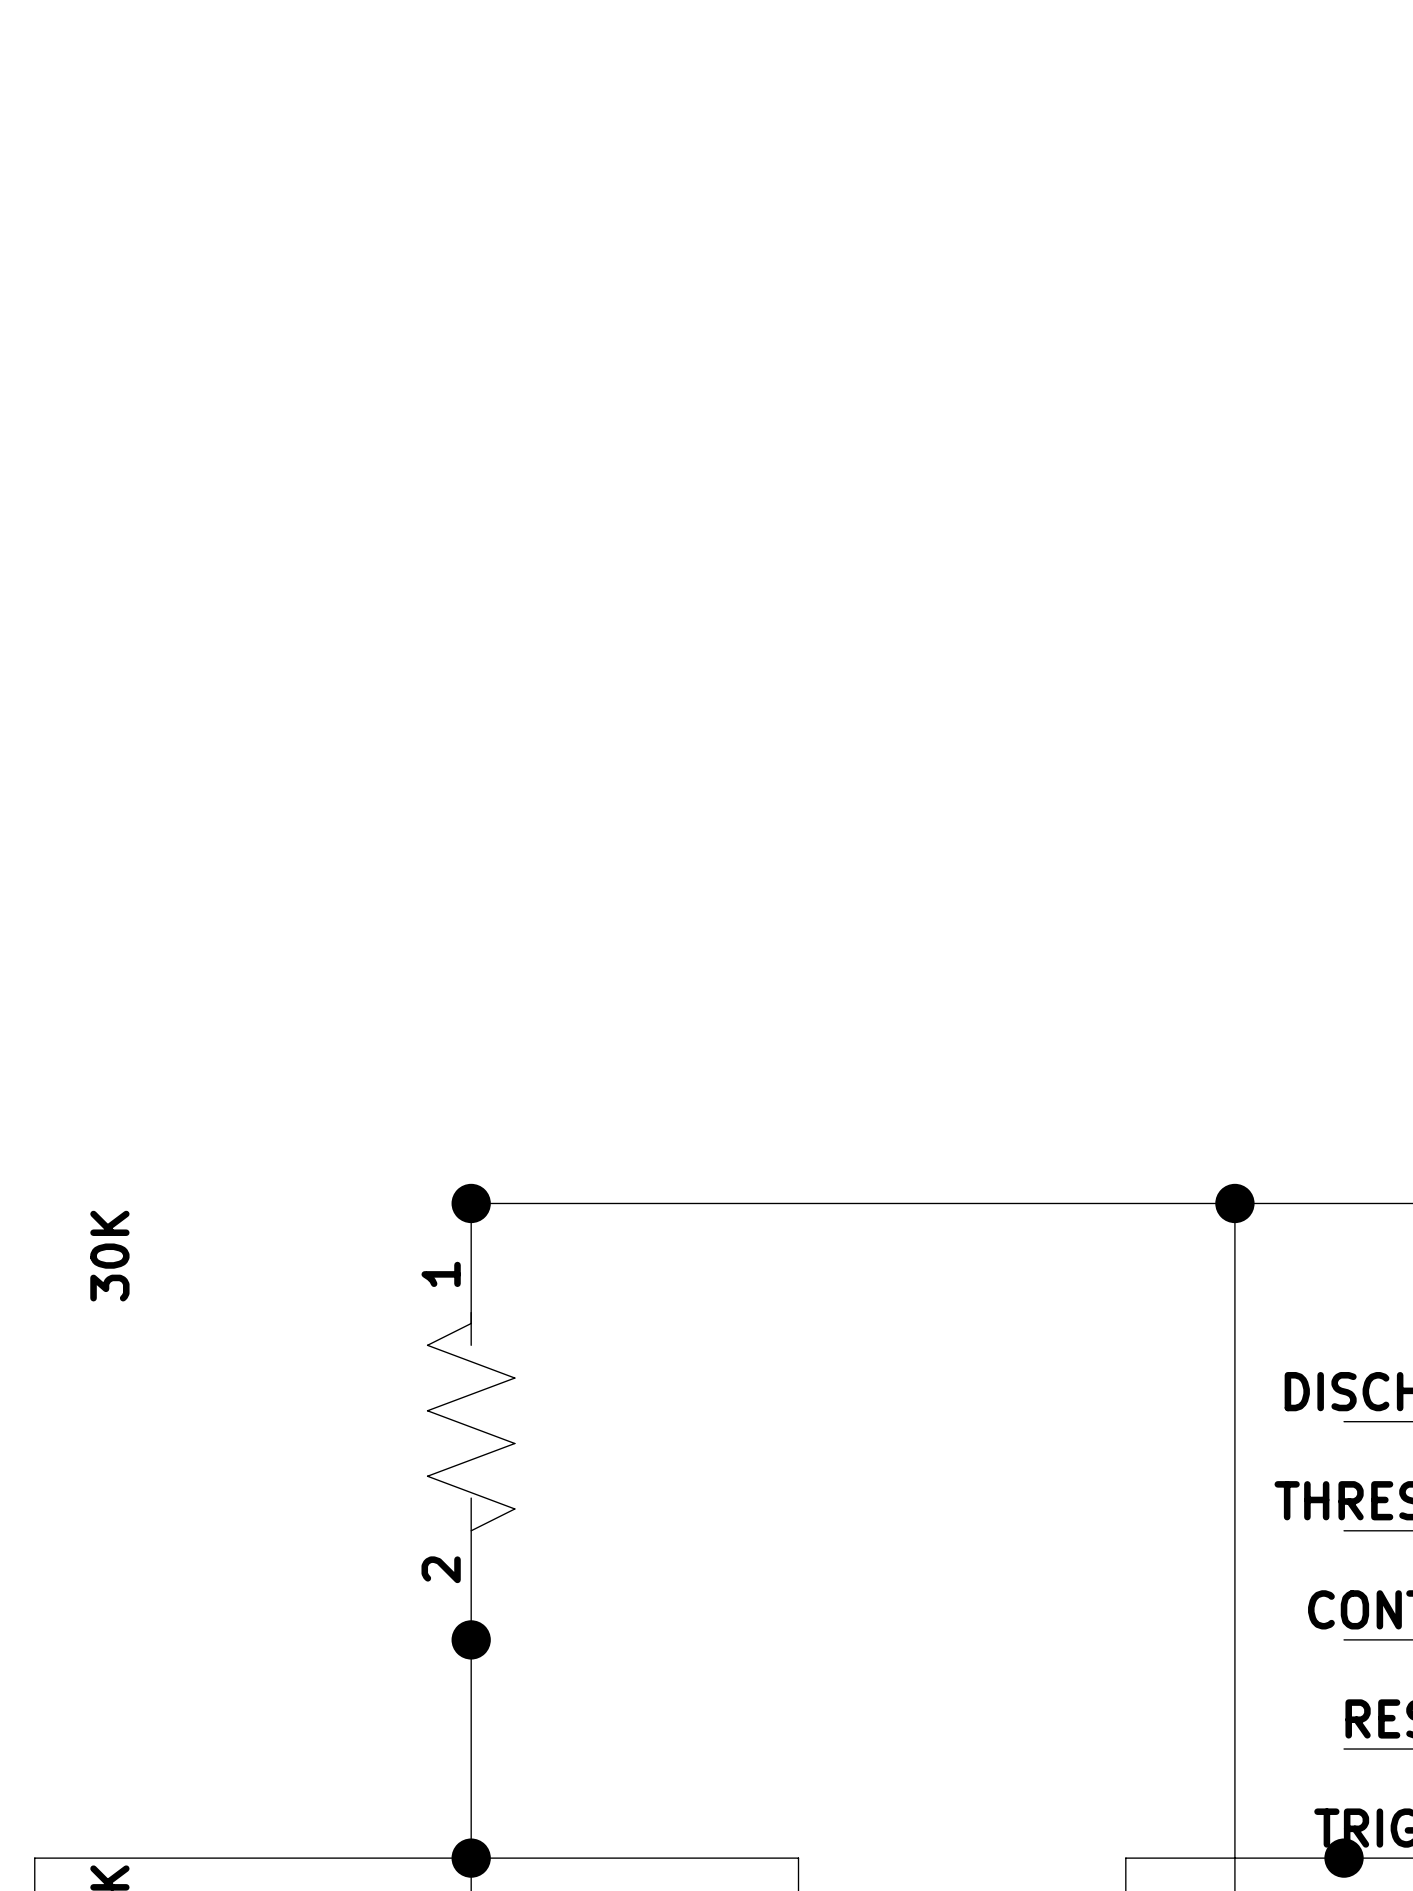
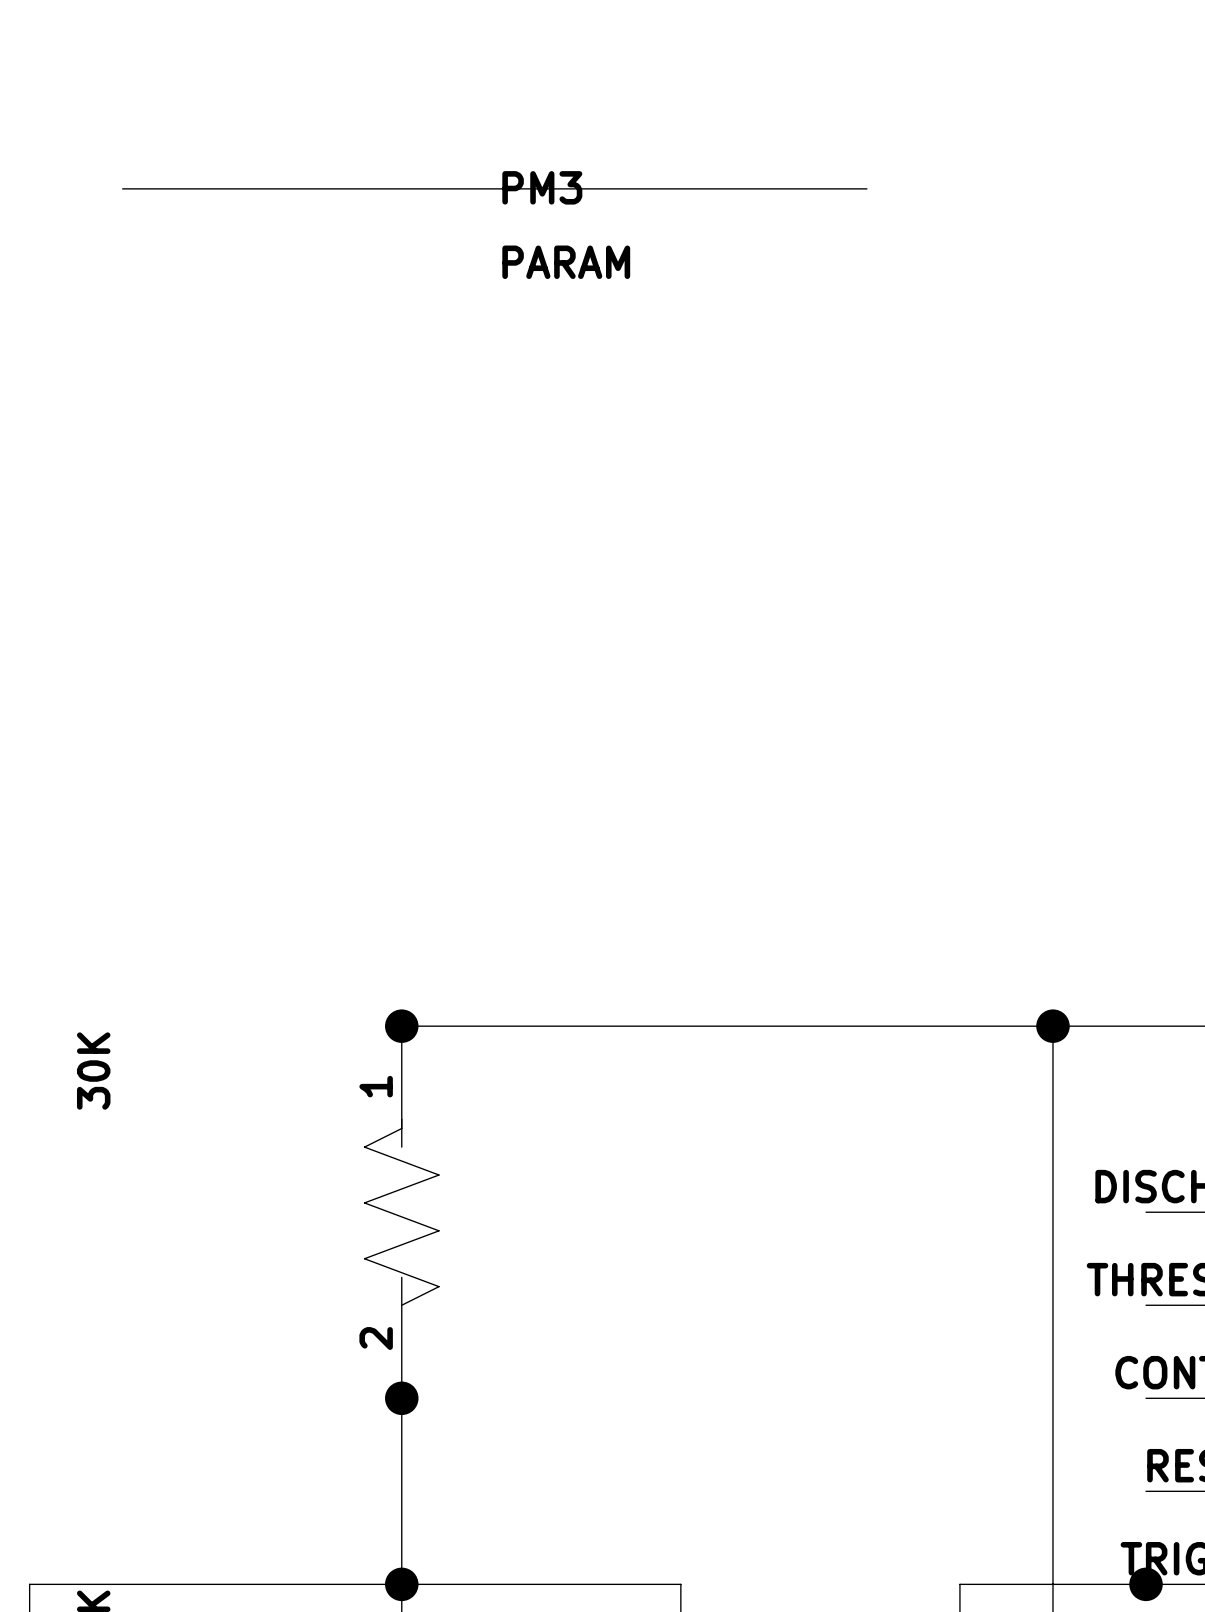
PM3: none -> PARAM (494, 188)

